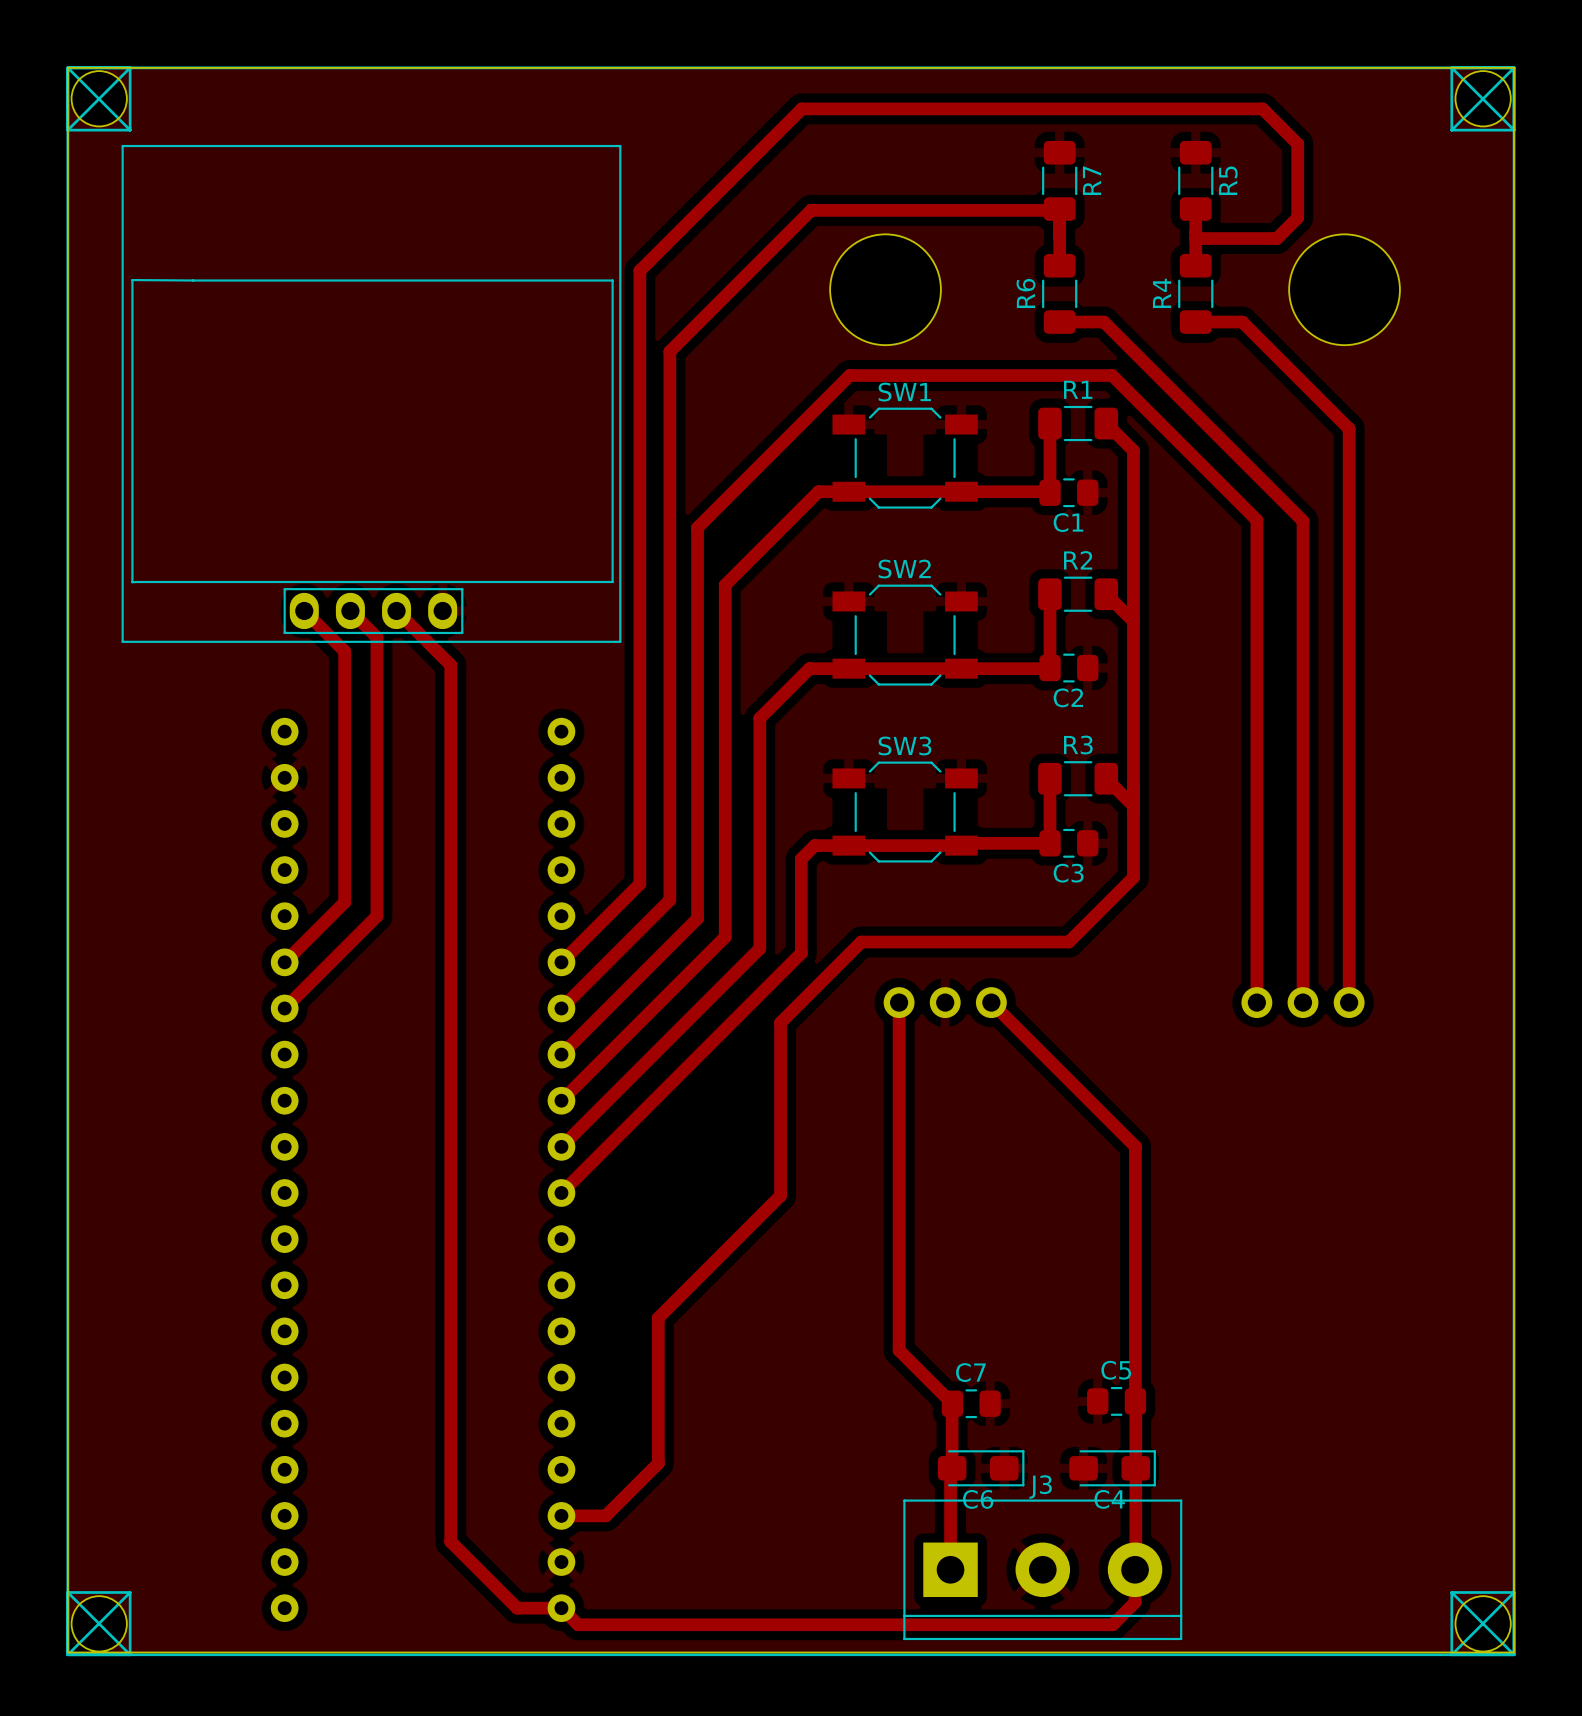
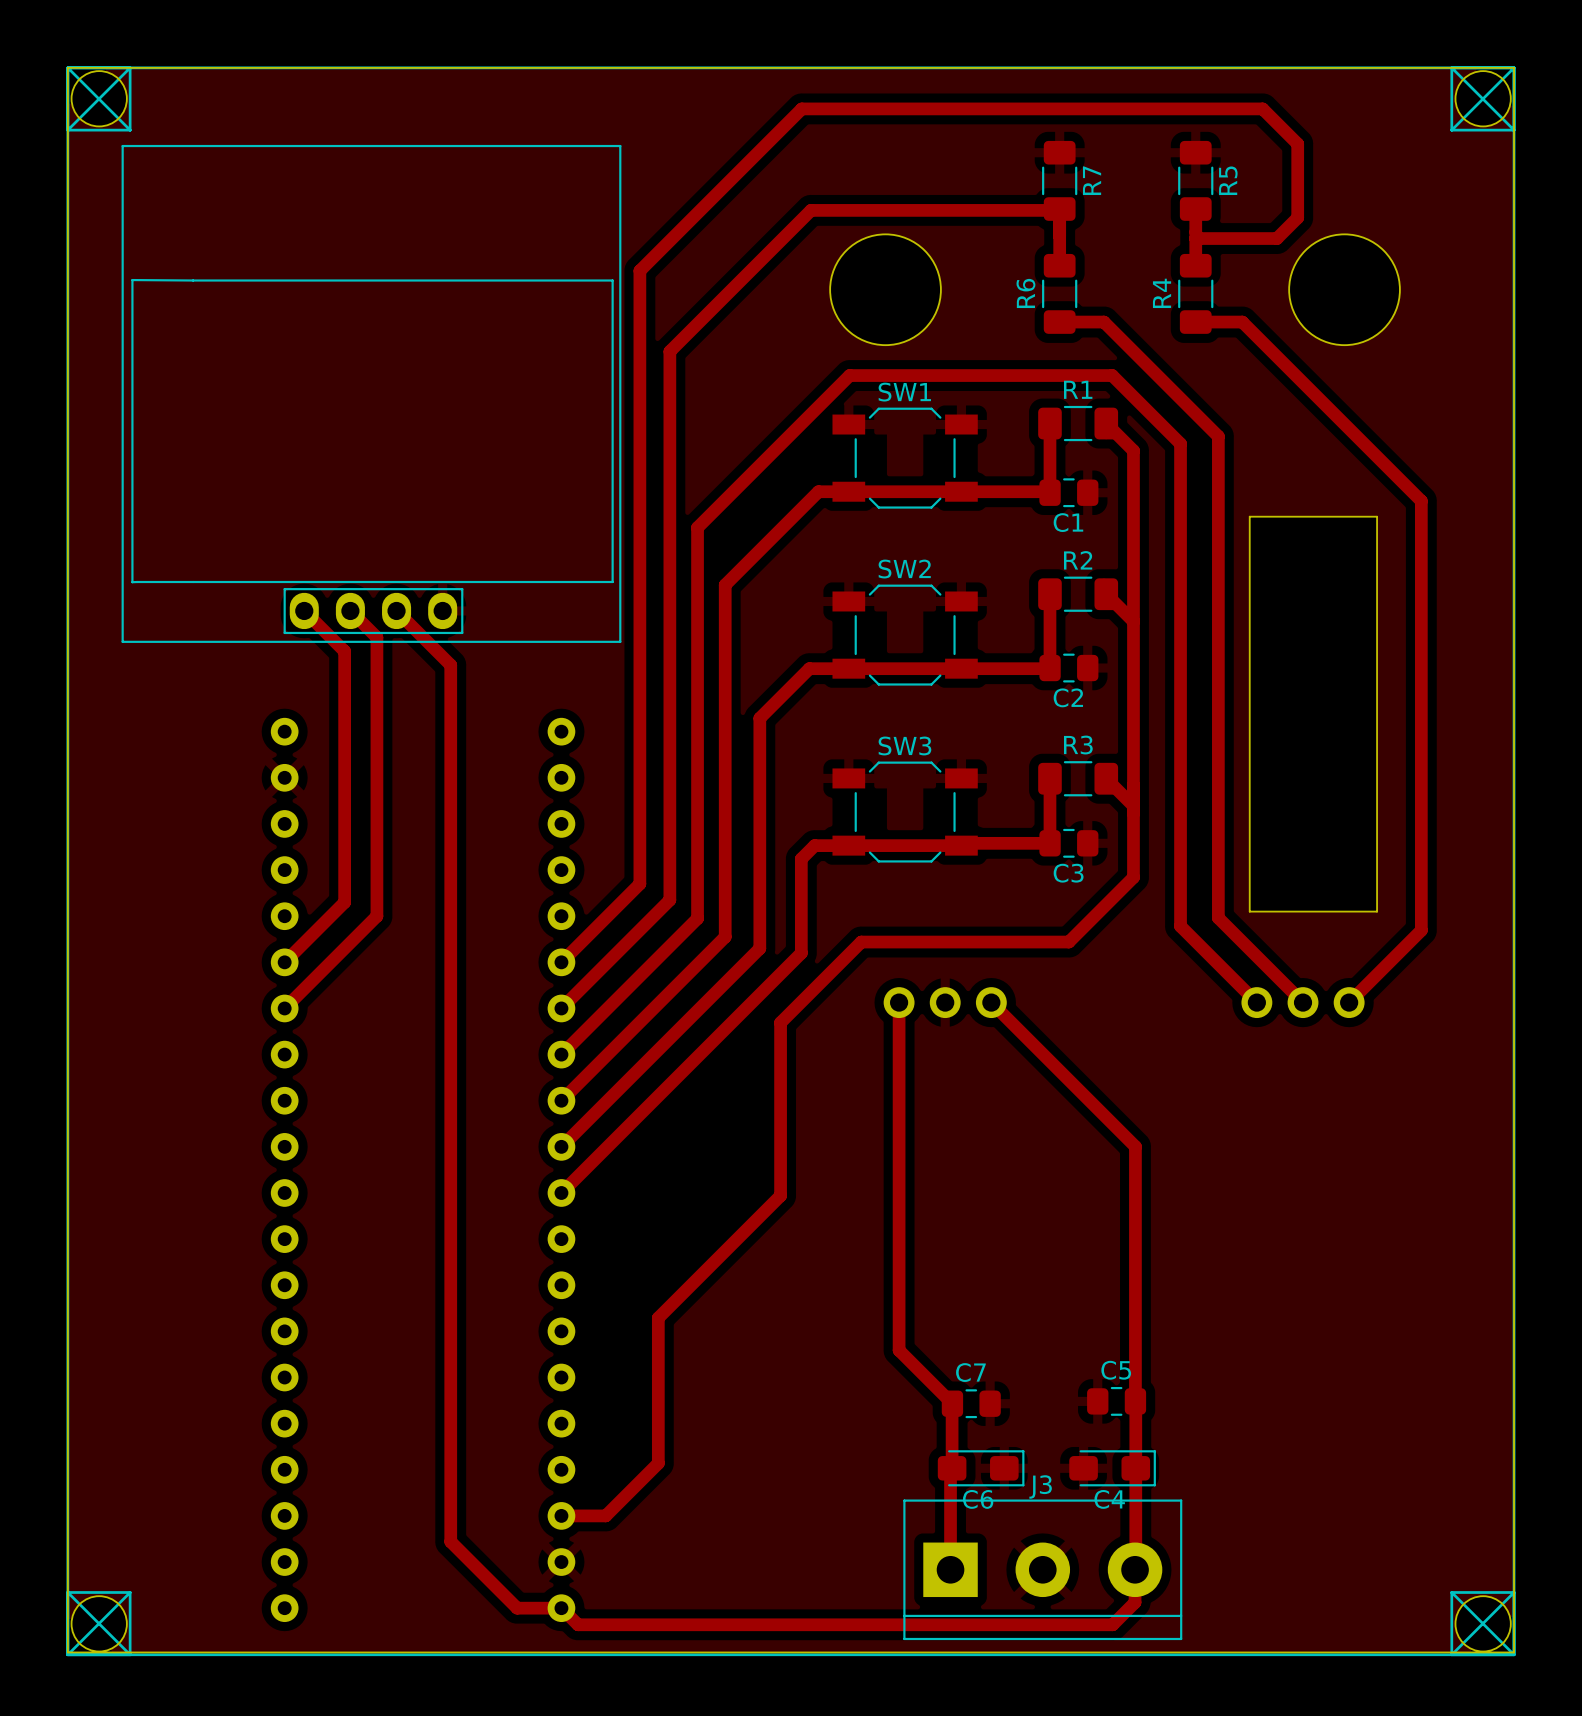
track: (1349, 428) (1349, 1002) -> (1349, 428) (1421, 501) (1421, 930) (1349, 1002)
track: (1218, 436) (1303, 521) (1303, 1002) -> (1218, 436) (1218, 917) (1303, 1002)
track: (1180, 443) (1256, 520) (1256, 1002) -> (1180, 443) (1180, 926) (1256, 1002)
board edge: none -> (1249, 516) (1377, 516) (1377, 911) (1249, 911) (1249, 516)

